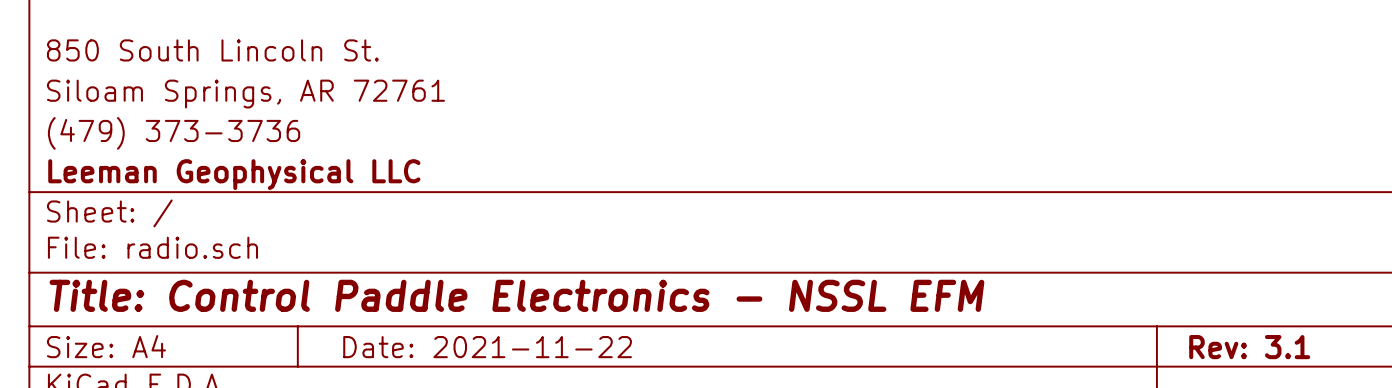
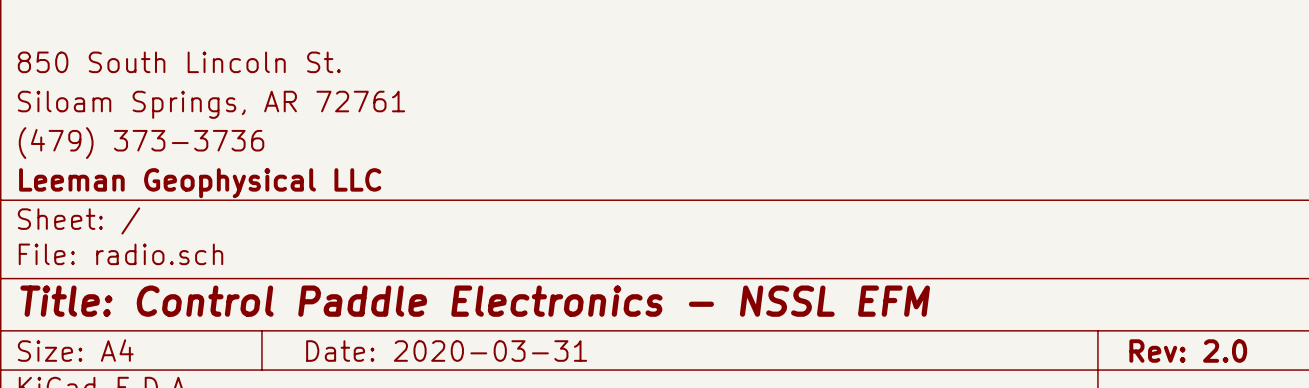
title block: Date: 2021-11-22 (487, 347) -> Date: 2020-03-31 (446, 351)
title block: Rev: 3.1 (1249, 347) -> Rev: 2.0 (1188, 351)

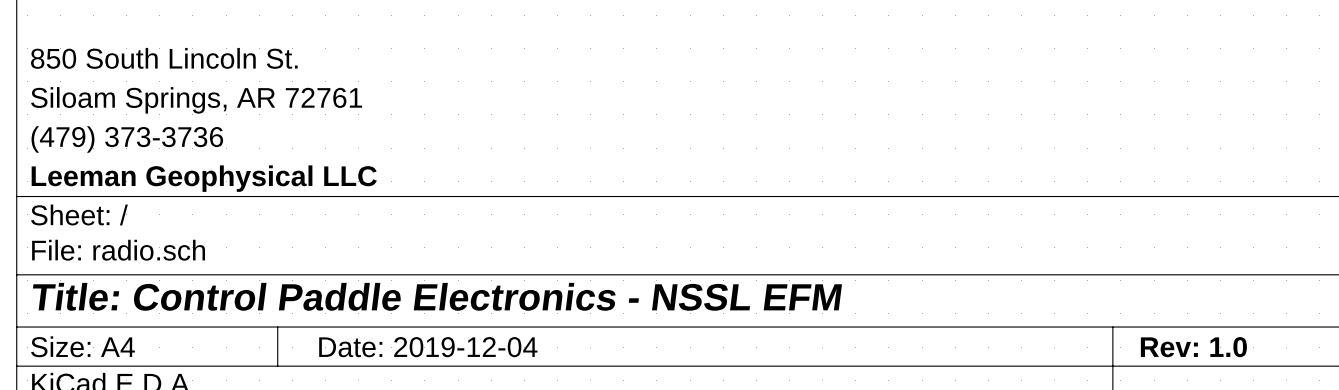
title block: Date: 2020-03-31 (446, 351) -> Date: 2019-12-04 (428, 347)
title block: Rev: 2.0 (1188, 351) -> Rev: 1.0 (1193, 347)

